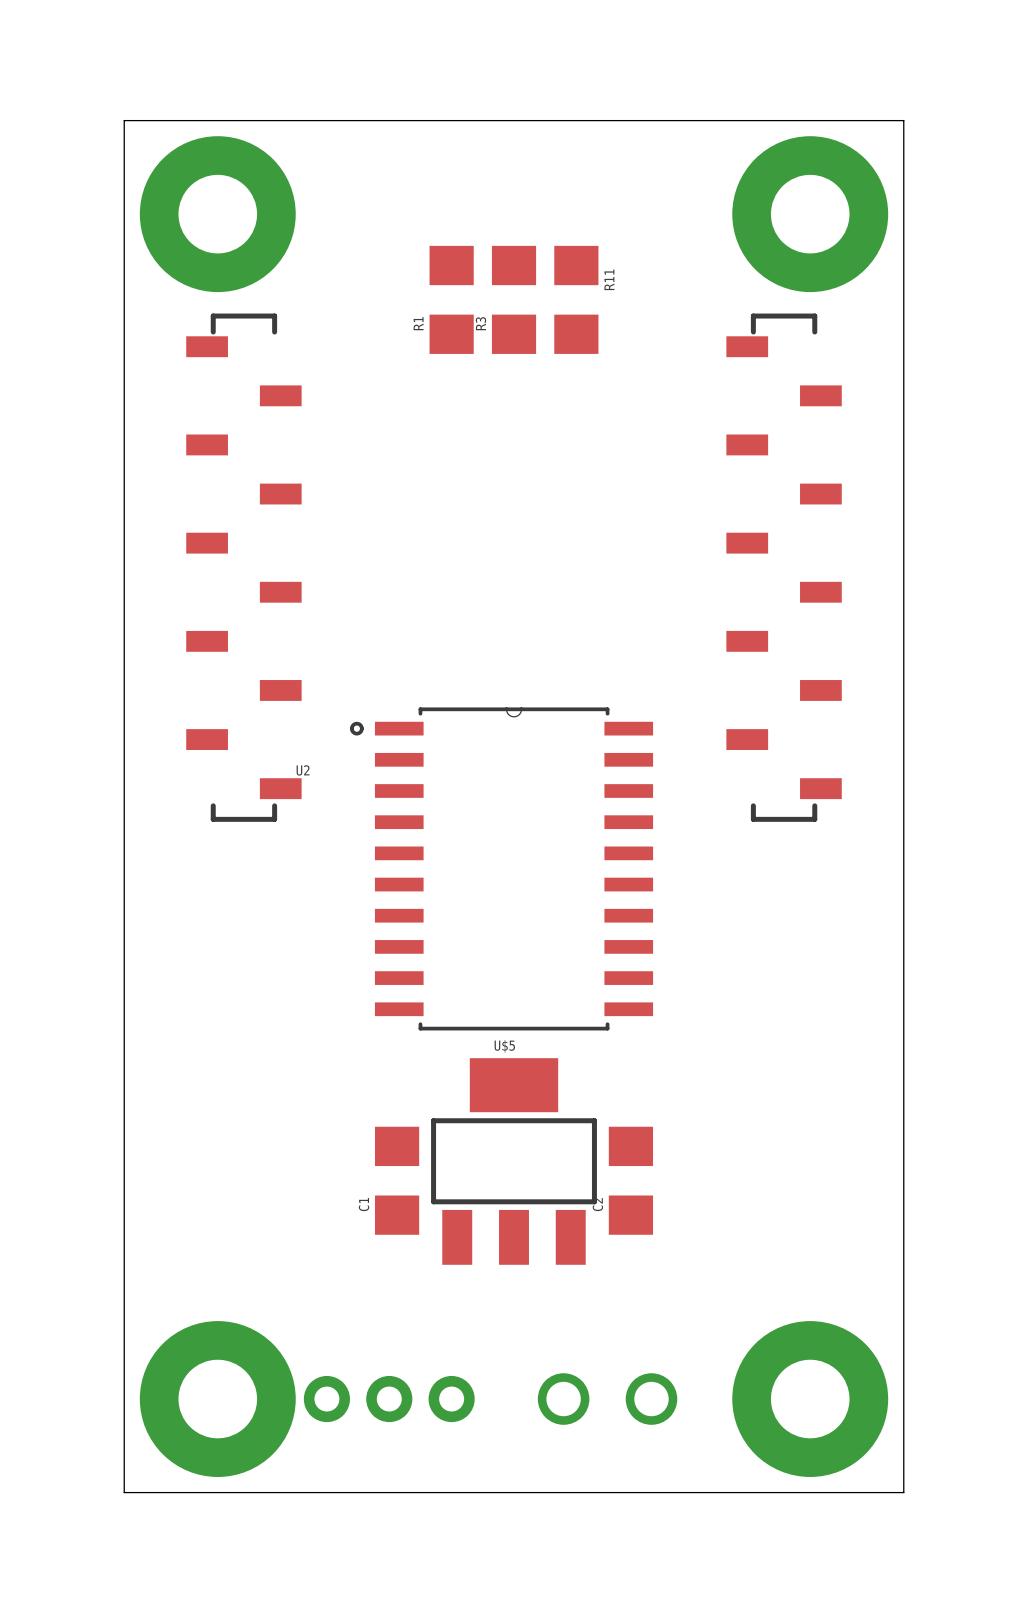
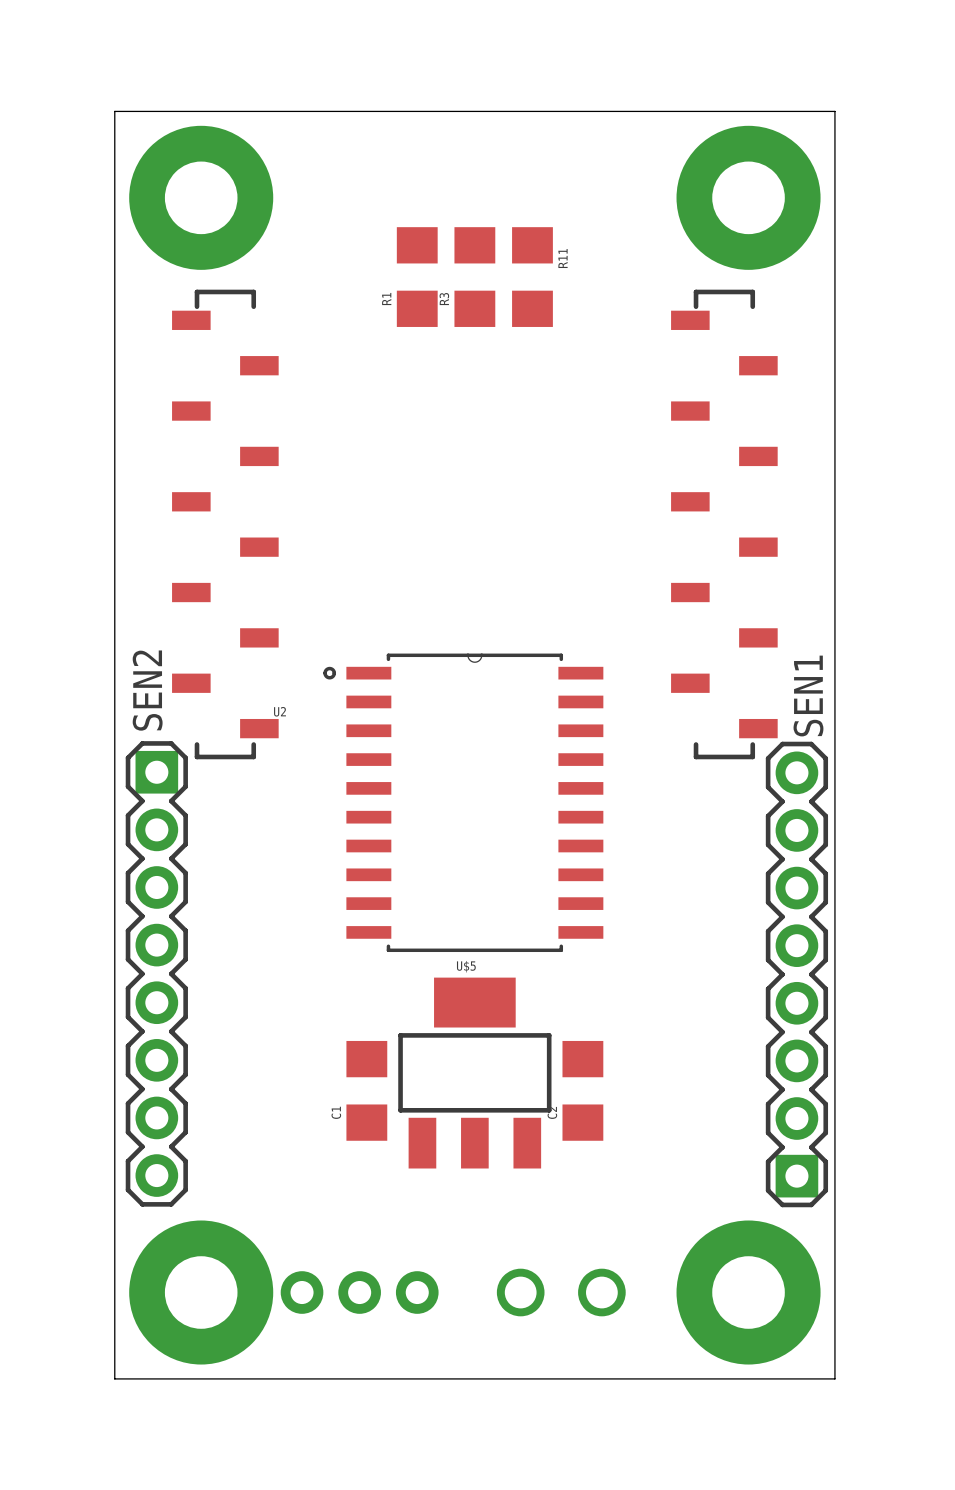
SEN2: none -> (156, 973)
SEN1: none -> (796, 974)

